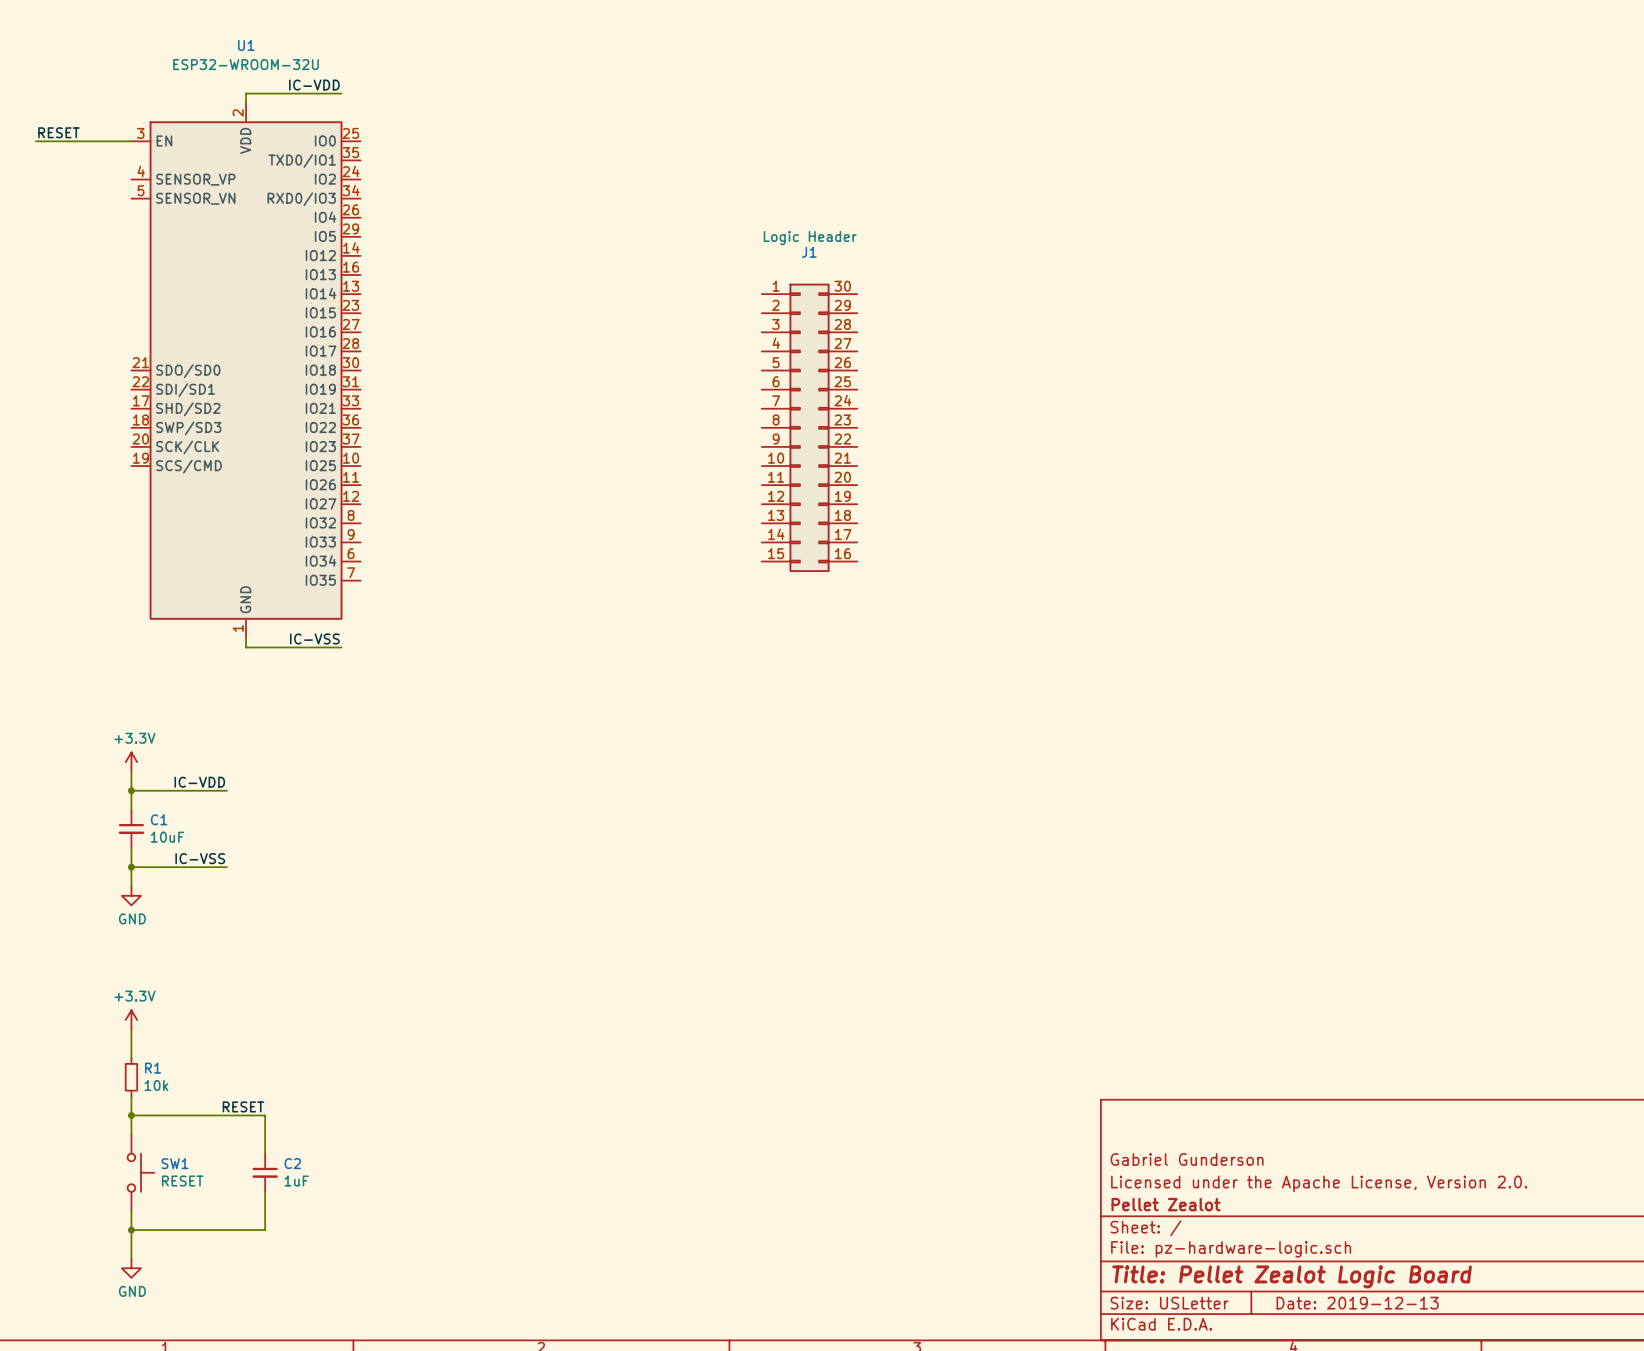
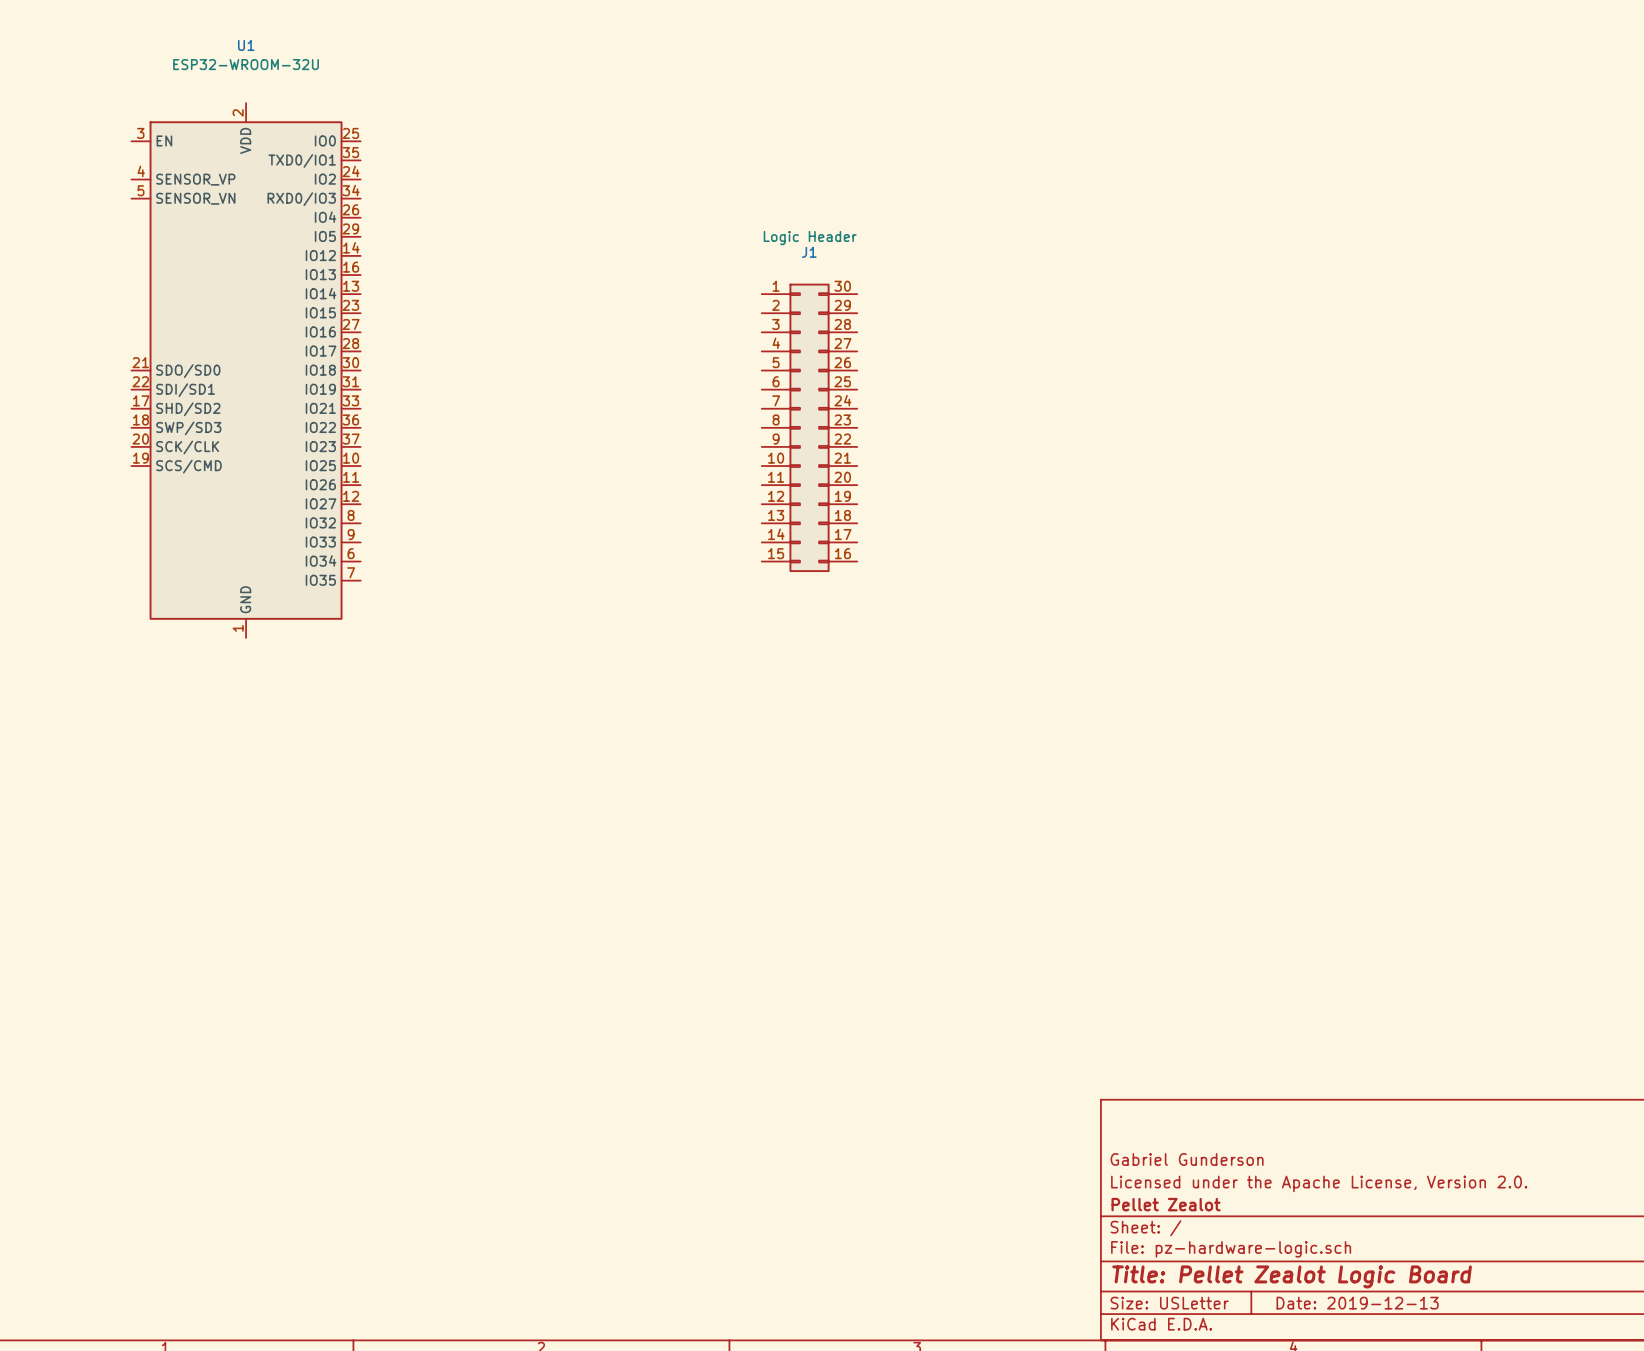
label: IC-VDD (314, 85) -> none
wire: (341, 93) (246, 93) (246, 103) -> none
label: RESET (58, 132) -> none
wire: (35, 141) (131, 141) -> none
wire: (246, 637) (246, 647) (341, 647) -> none
label: IC-VSS (314, 638) -> none
power symbol: +3.3V (131, 762) -> none
wire: (131, 771) (131, 809) -> none
label: IC-VDD (199, 782) -> none
wire: (131, 790) (226, 790) -> none
junction: (131, 790) -> none
C1: 10uF (131, 828) -> none
wire: (131, 848) (131, 886) -> none
label: IC-VSS (200, 858) -> none
wire: (131, 867) (226, 867) -> none
junction: (131, 867) -> none
power symbol: GND (131, 895) -> none
power symbol: +3.3V (131, 1019) -> none
wire: (131, 1029) (131, 1058) -> none
R1: 10k (131, 1077) -> none
wire: (131, 1096) (131, 1134) -> none
label: RESET (243, 1106) -> none
wire: (131, 1115) (265, 1115) (265, 1153) -> none
junction: (131, 1115) -> none
SW1: RESET (140, 1172) -> none
C2: 1uF (265, 1172) -> none
wire: (265, 1191) (265, 1230) (131, 1230) -> none
wire: (131, 1210) (131, 1258) -> none
junction: (131, 1230) -> none
power symbol: GND (131, 1268) -> none

